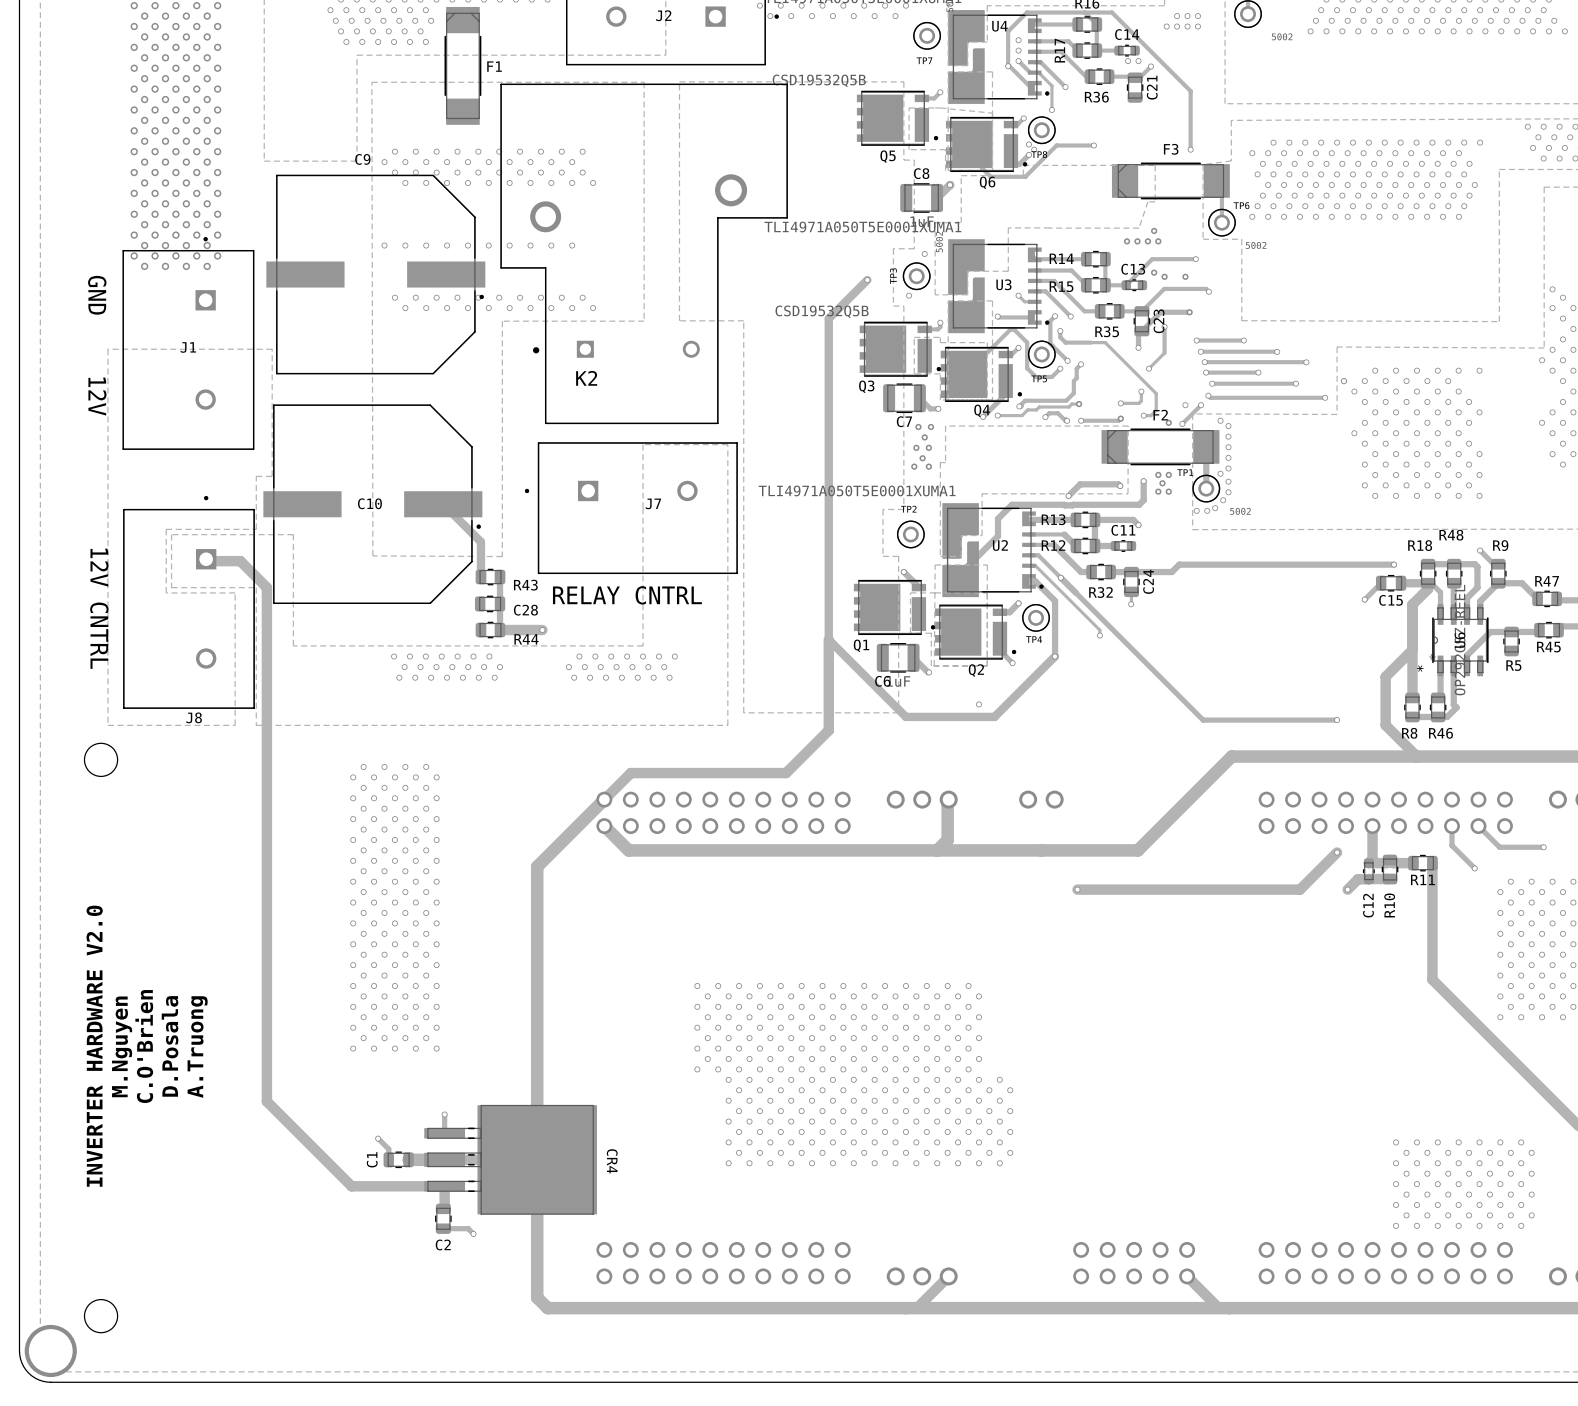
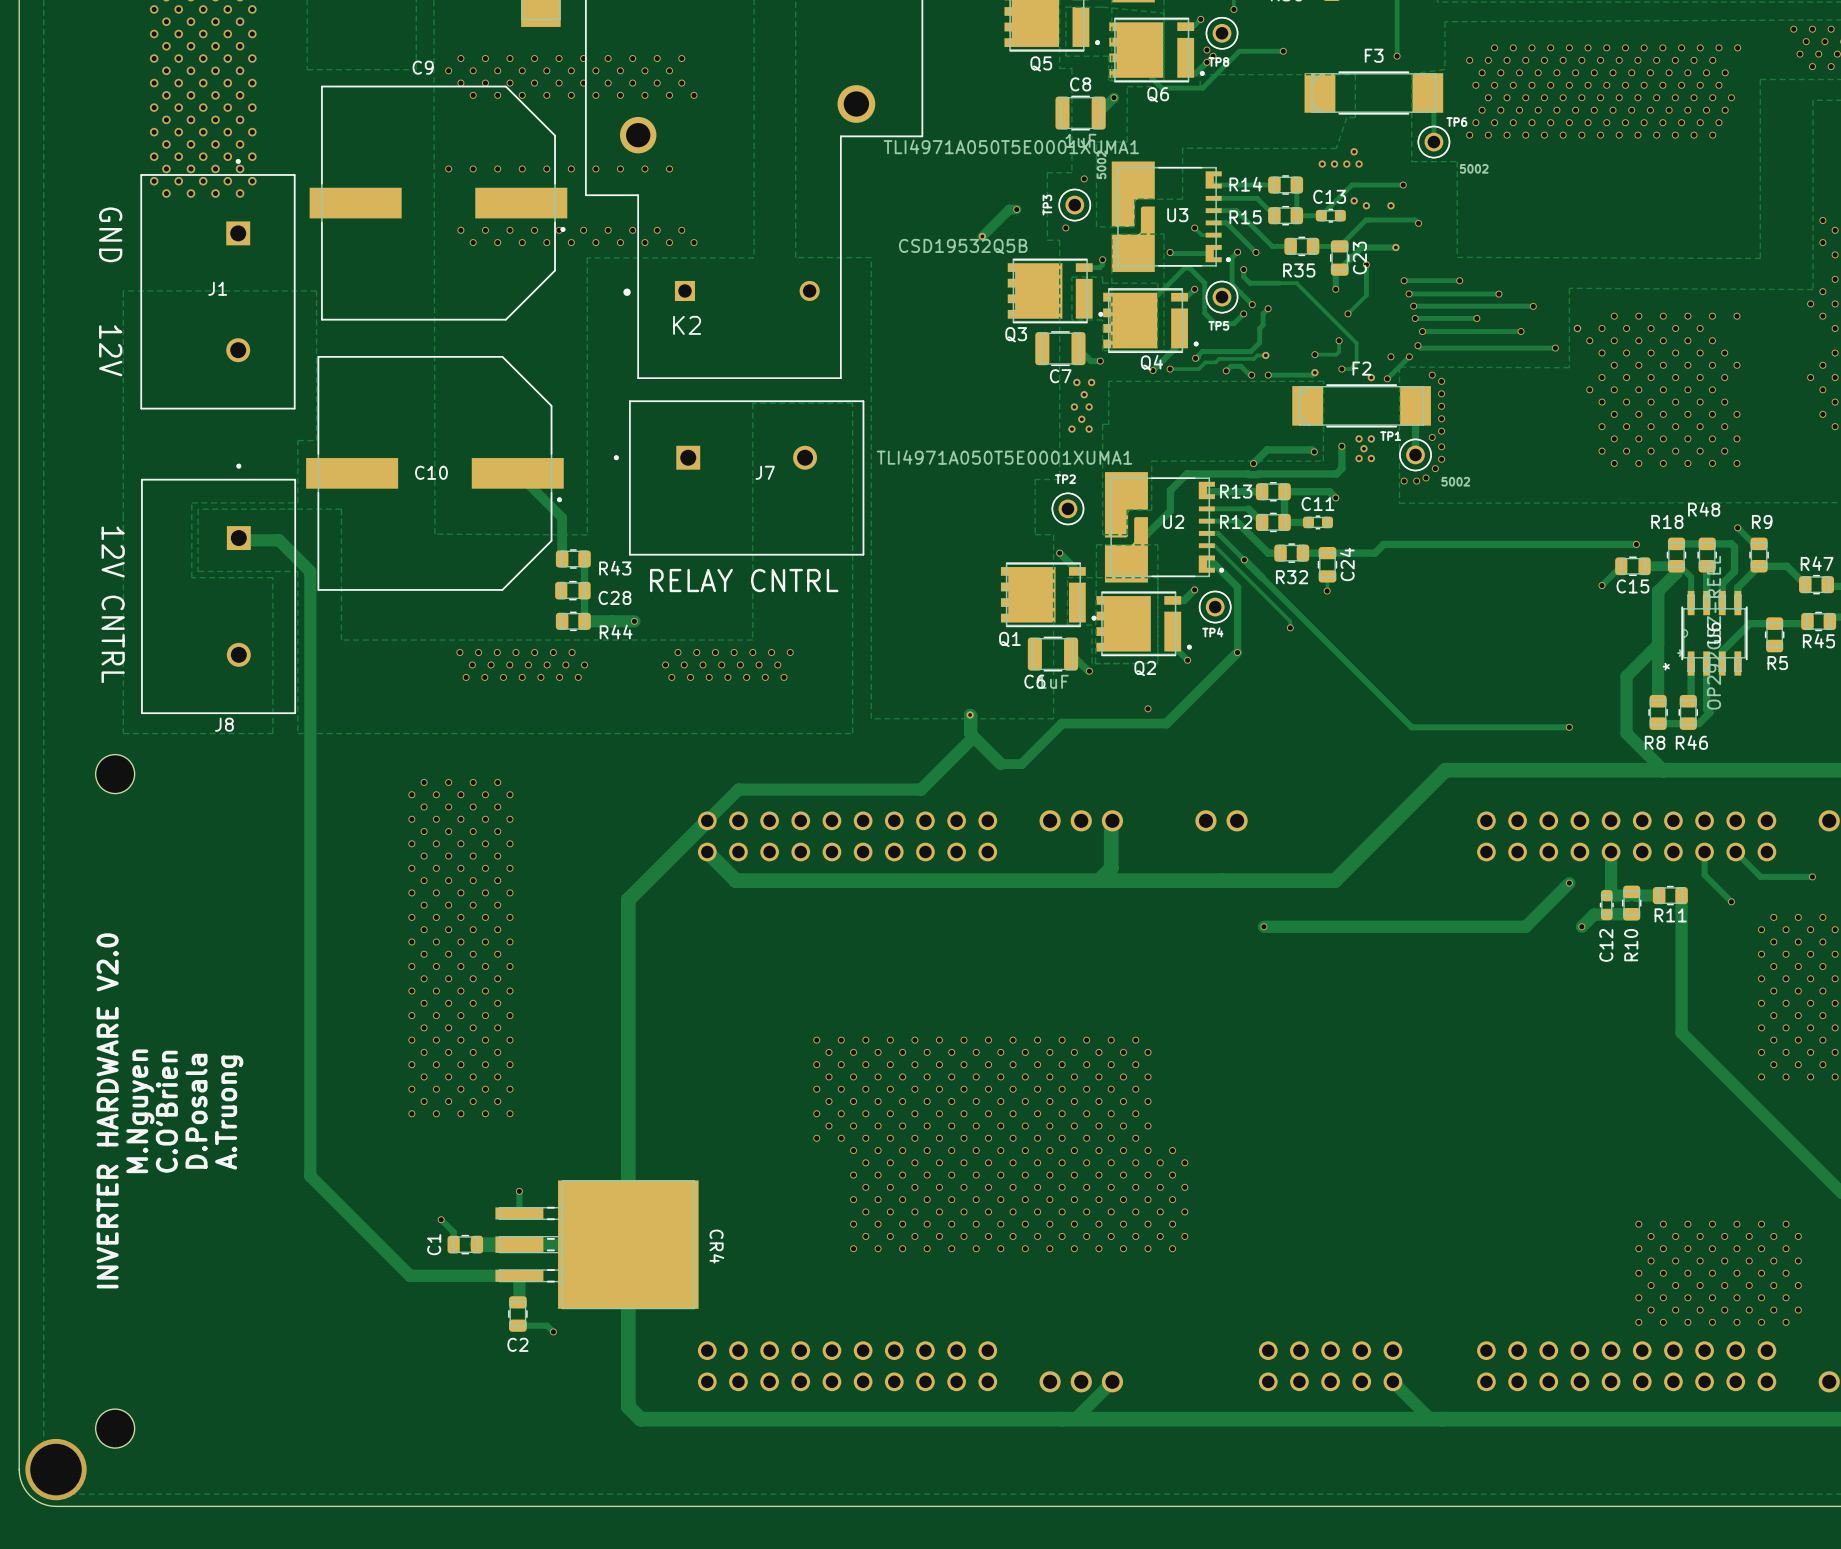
track: (867, 280) (828, 318) (828, 639) -> (1016, 209) (1009, 209) (982, 236)
via: none -> (982, 236)
track: (828, 639) (905, 716) -> (971, 716) (970, 714) (970, 733) (1000, 764) (1021, 764) (1062, 723)
track: (828, 639) (828, 710) -> none
via: none -> (970, 714)

